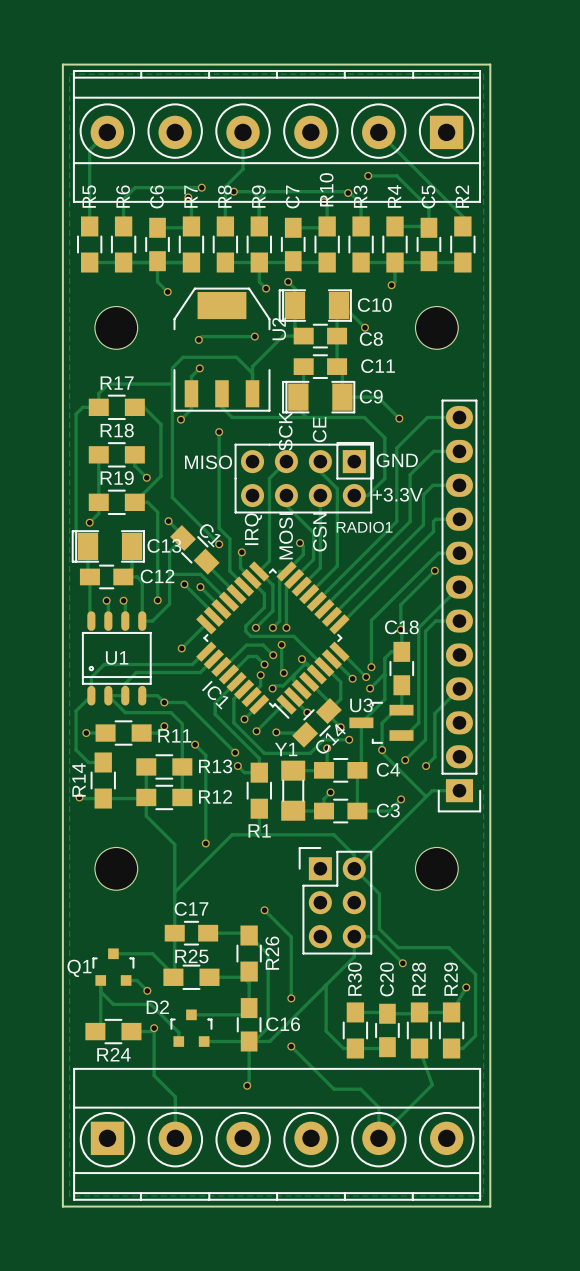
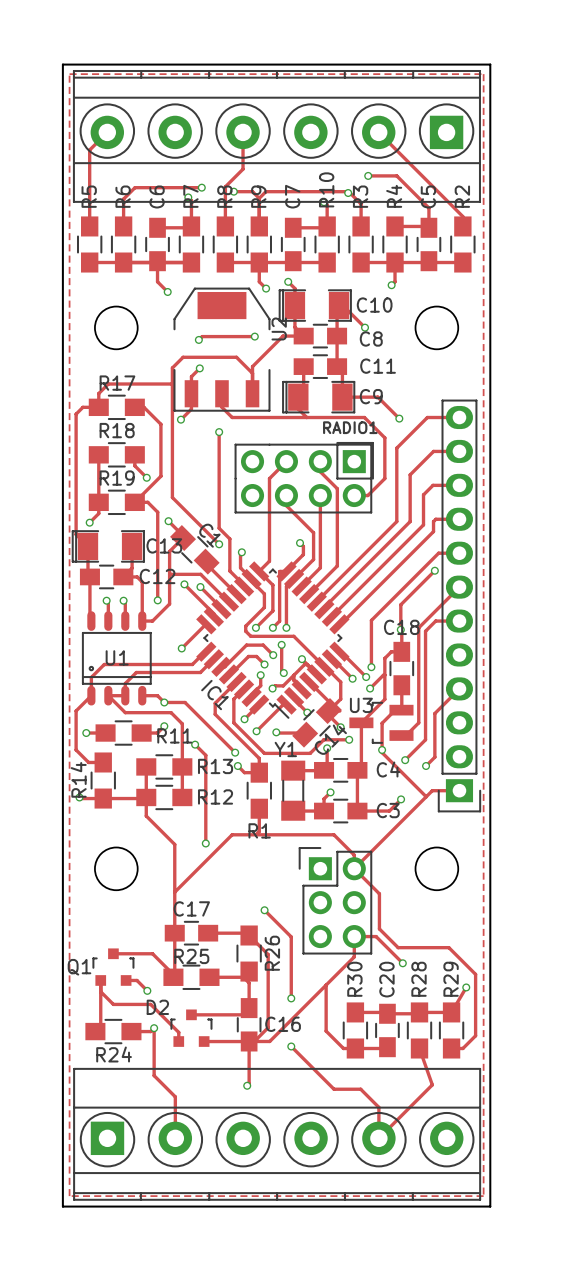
text: CE (319, 429) -> none
text: SCK (285, 431) -> none
text: GND (397, 460) -> none
text: MISO (208, 462) -> none
text: +3.3V (397, 494) -> none
RADIO1 name position: RADIO1 (364, 527) -> RADIO1 (350, 427)
text: IRQ (253, 529) -> none
text: CSN (319, 532) -> none
text: MOSI (286, 536) -> none

